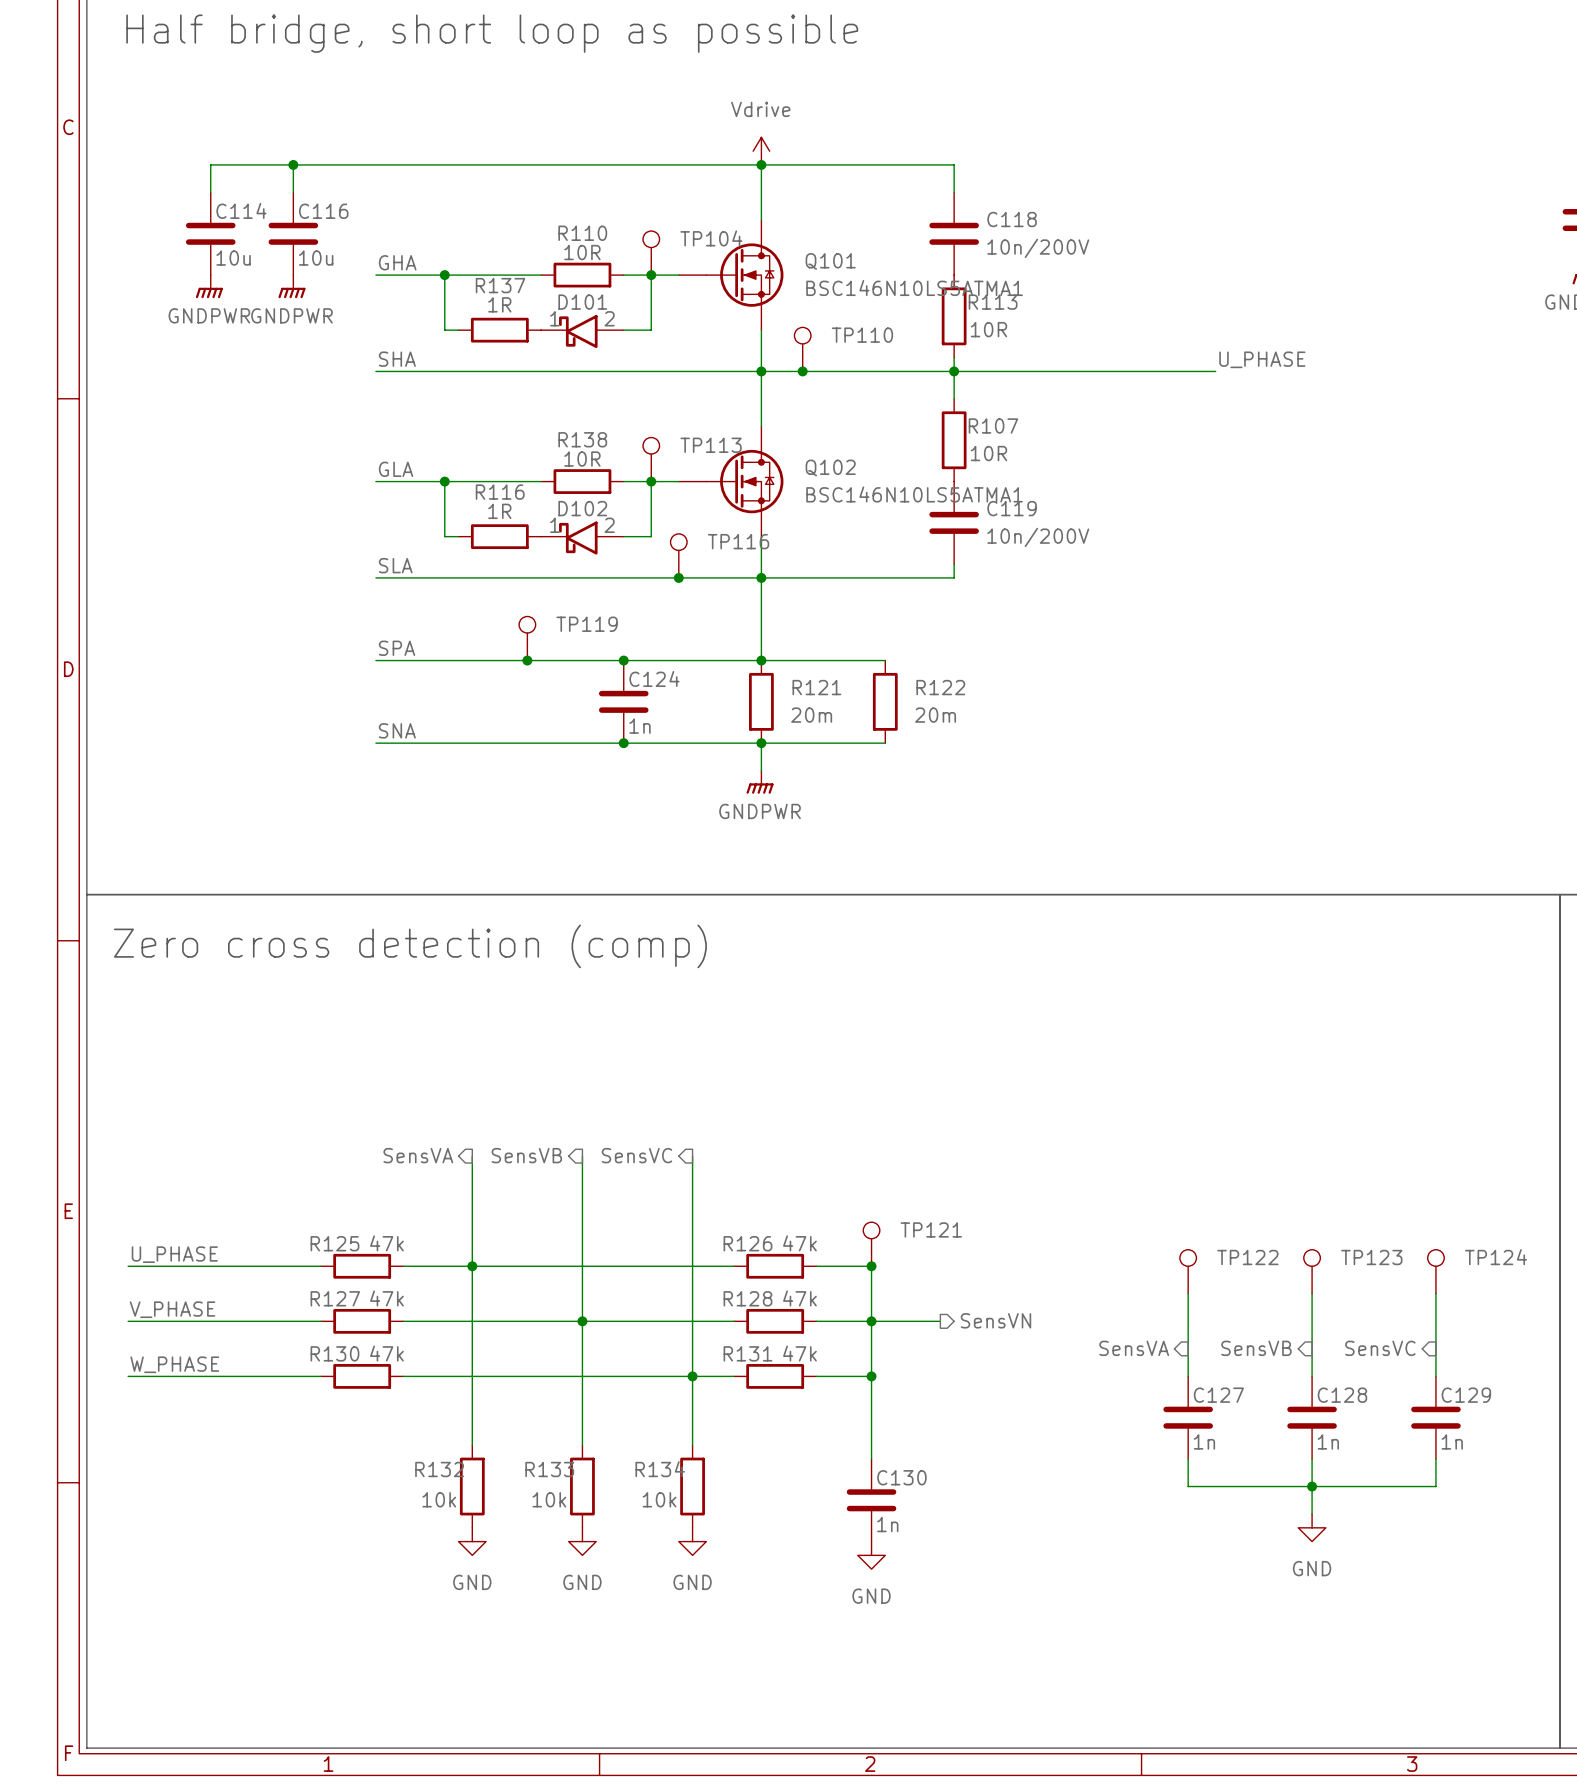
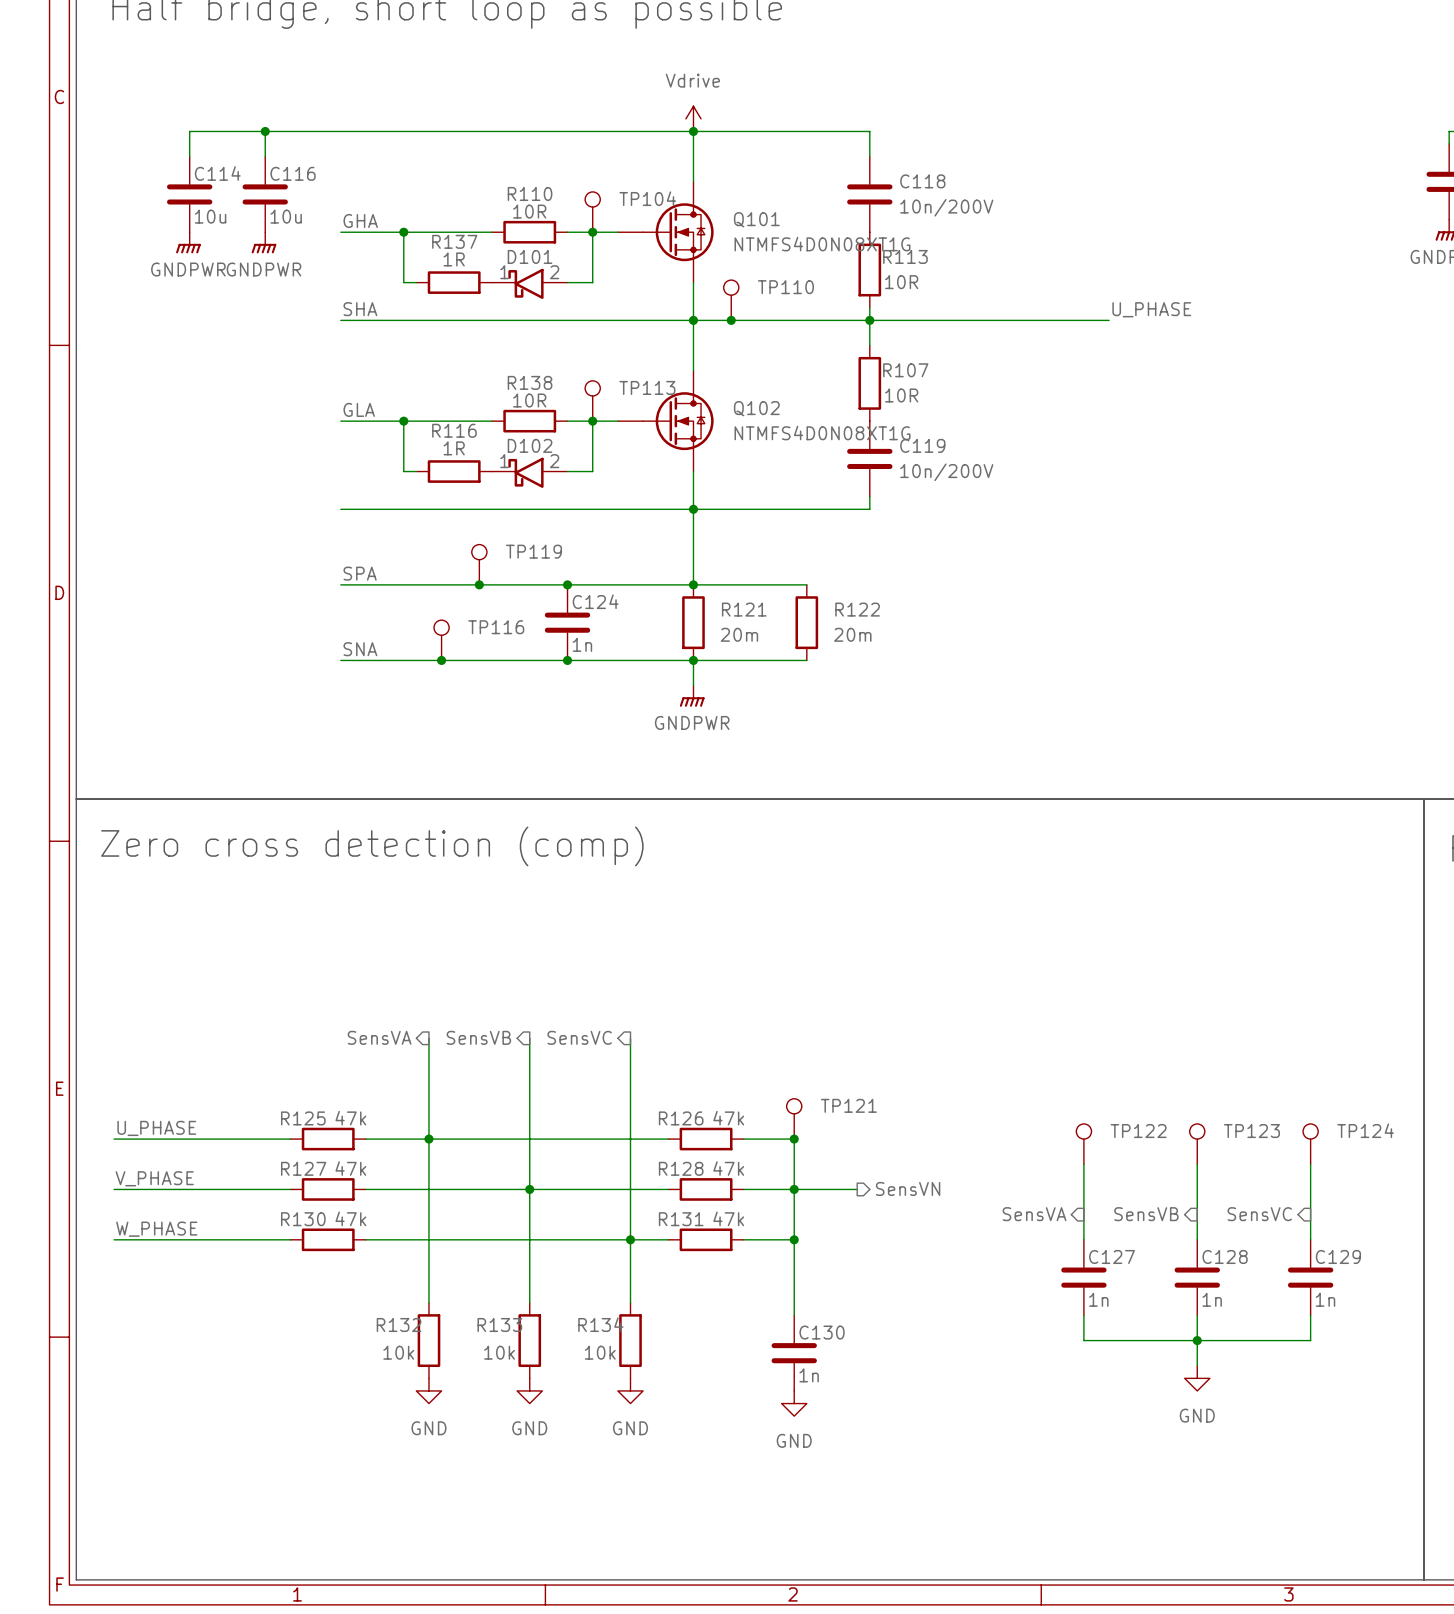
Q101 value: BSC146N10LS5ATMA1 (914, 288) -> NTMFS4D0N08XT1G (822, 244)
Q102 value: BSC146N10LS5ATMA1 (914, 494) -> NTMFS4D0N08XT1G (822, 432)
TP116 position: (678, 555) -> (441, 640)
label: SLA (395, 565) -> none
junction: (678, 577) -> none
junction: none -> (441, 660)

